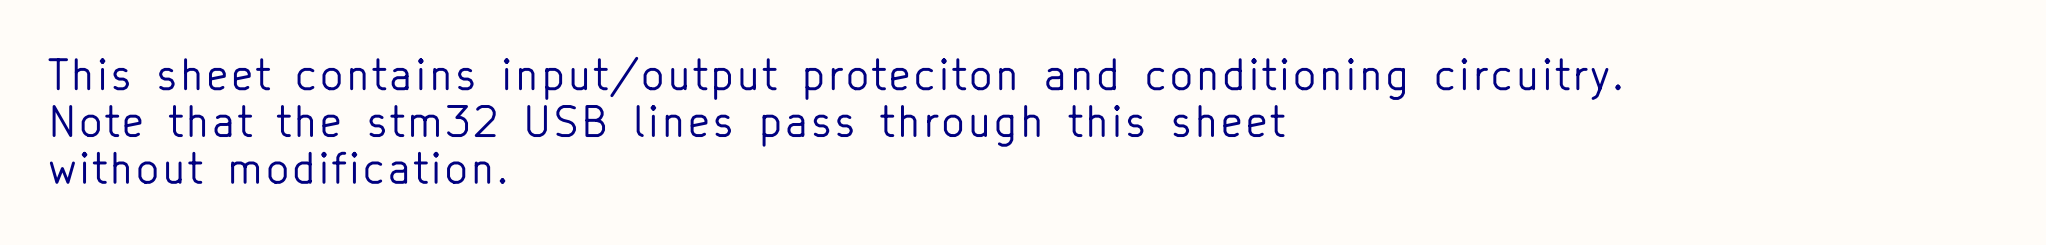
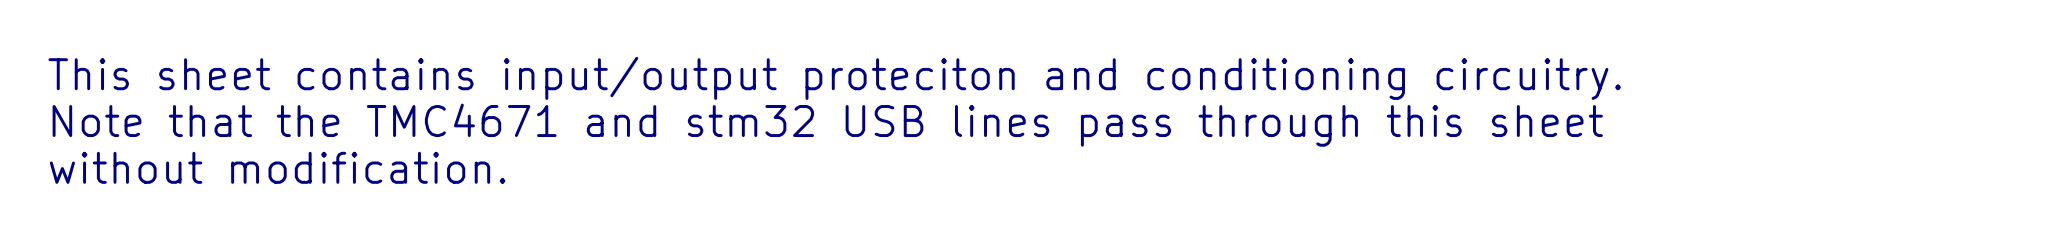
text: Note that the stm32 USB lines pass through this sheet (668, 125) -> Note that the TMC4671 and stm32 USB lines pass through this sheet (827, 125)

